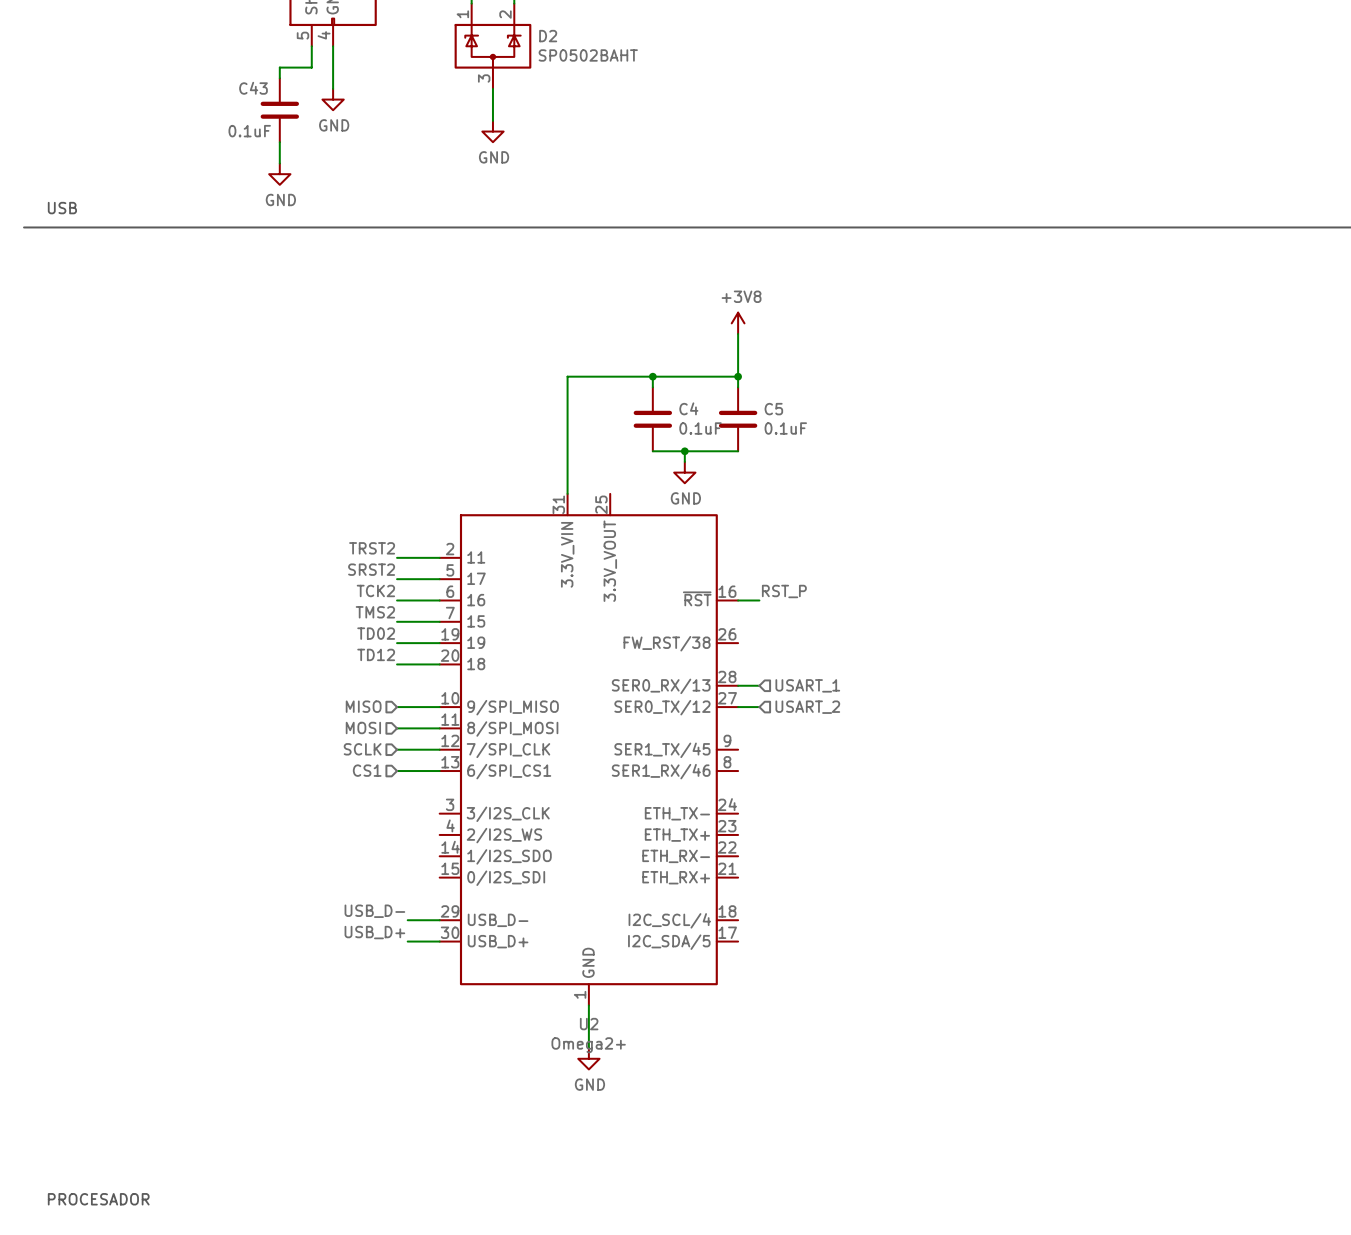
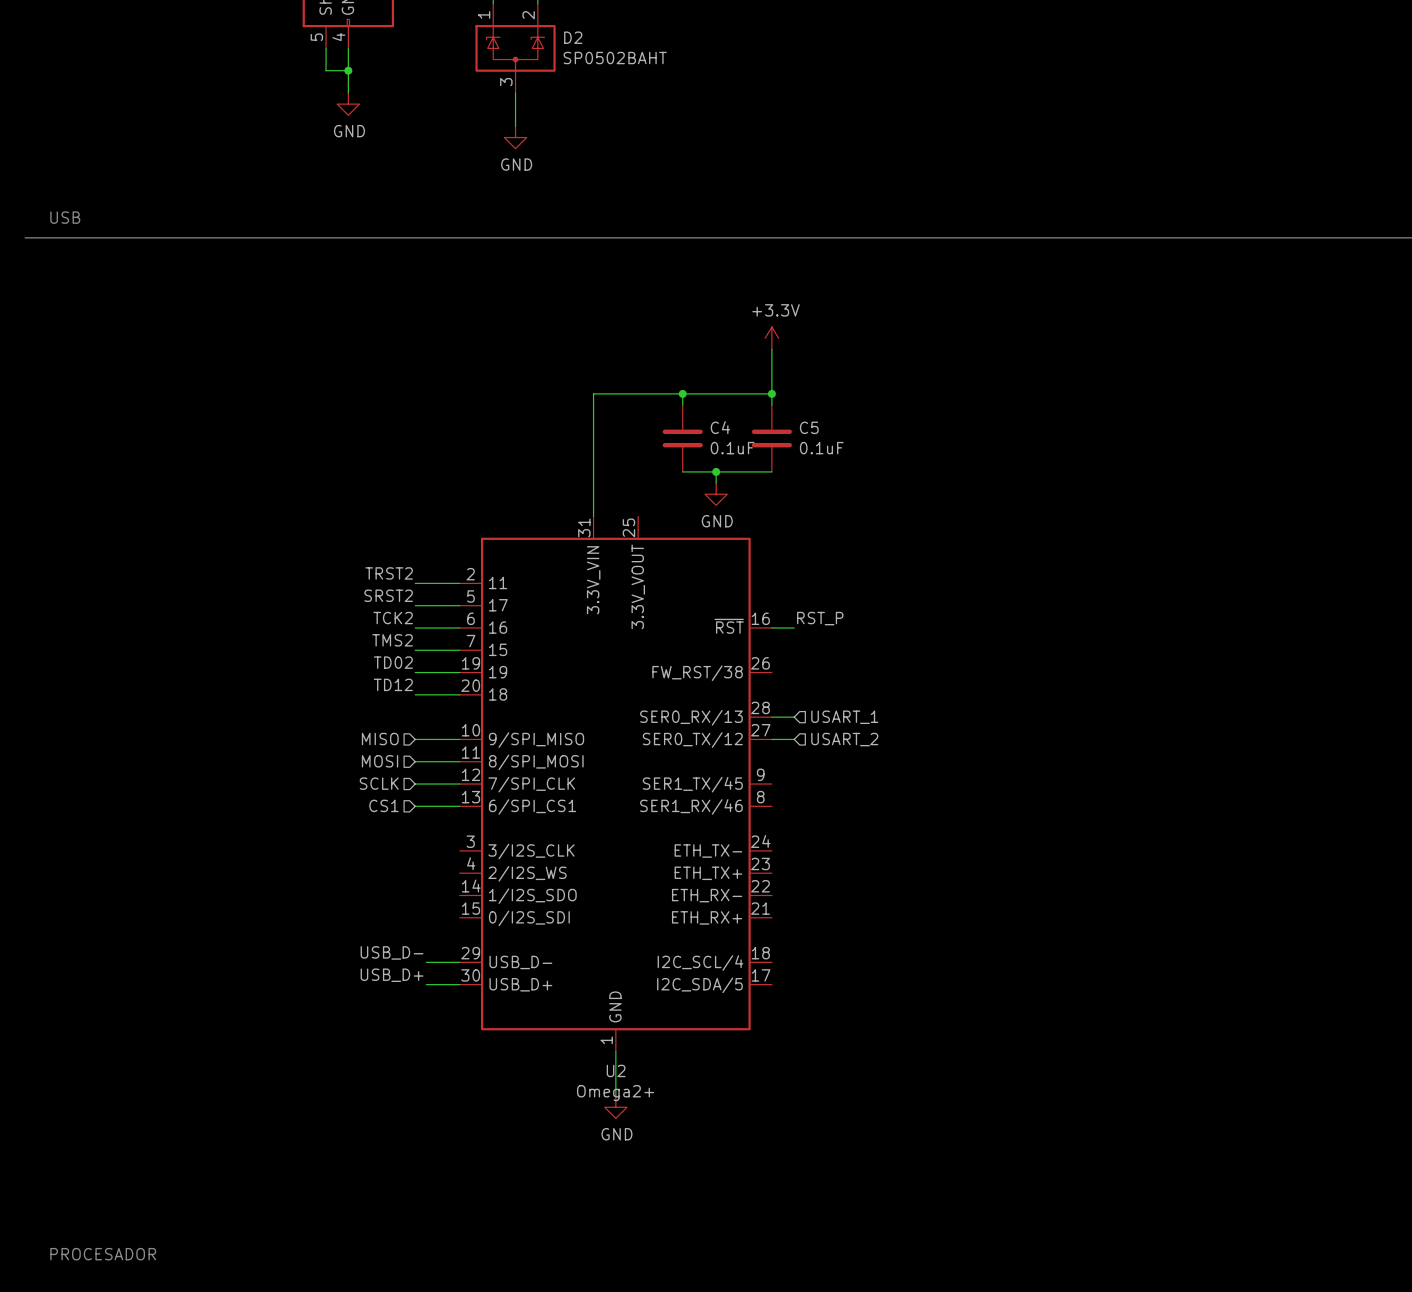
wire: (311, 67) (279, 67) (279, 78) -> (326, 70) (348, 70)
junction: none -> (348, 70)
C43: 0.1uF (279, 110) -> none
wire: (279, 142) (279, 163) -> none
power symbol: GND (279, 174) -> none
power symbol: +3V8 (738, 323) -> +3.3V (771, 338)

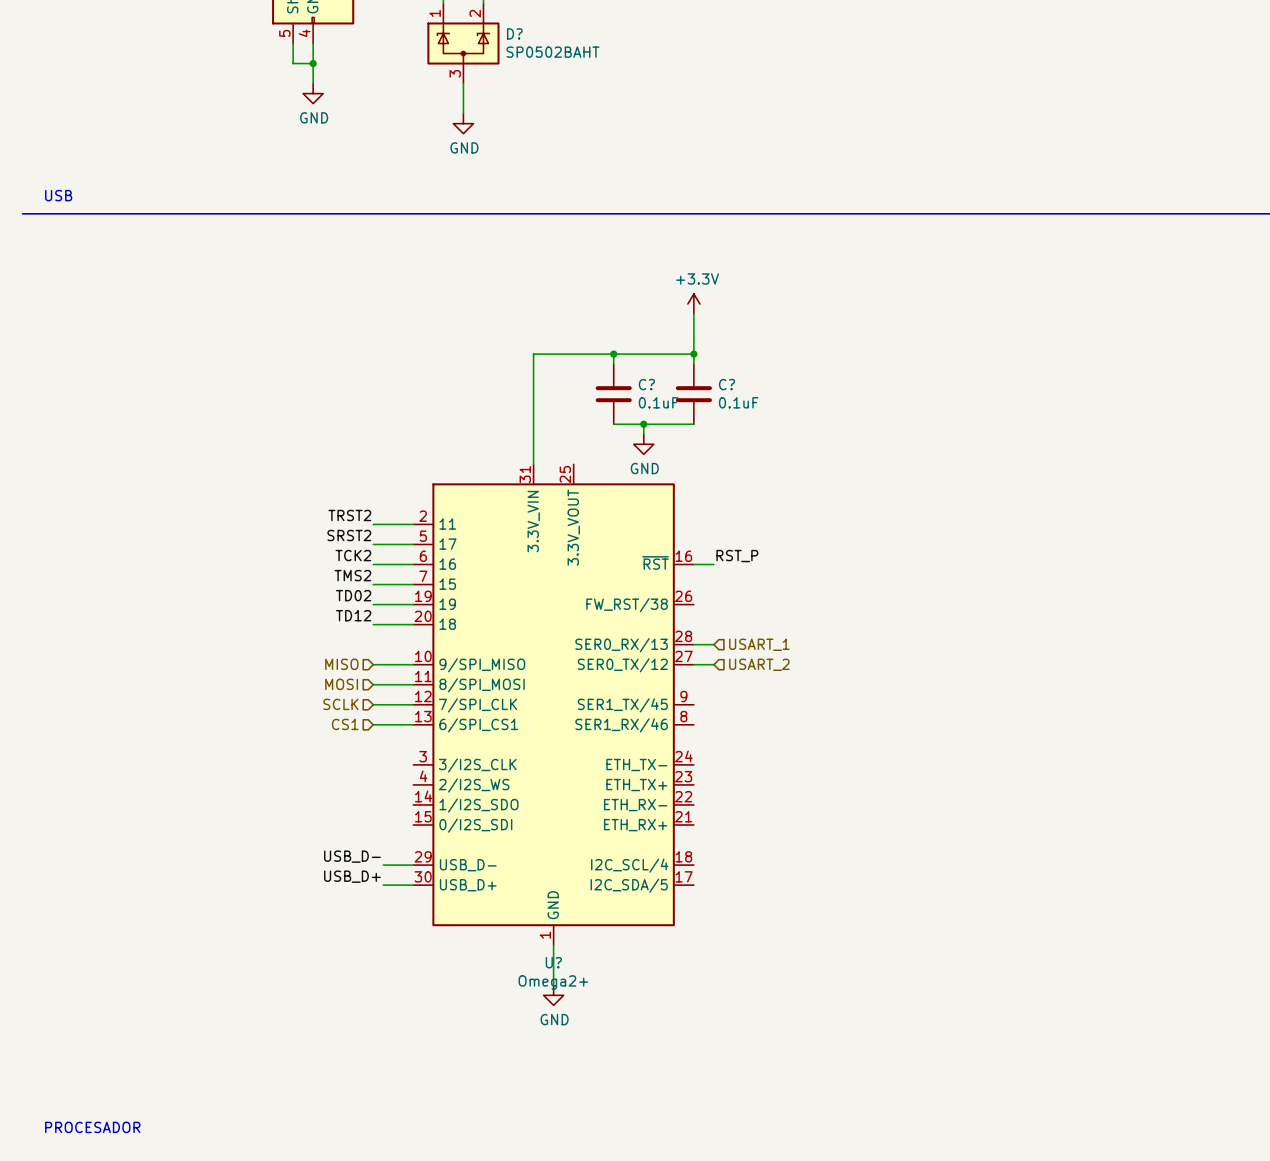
D2 name: D2 (573, 37) -> D? (514, 33)
C4 name: C4 (720, 427) -> C? (646, 384)
C5 name: C5 (809, 427) -> C? (727, 384)
U2 name: U2 (616, 1070) -> U? (553, 962)

